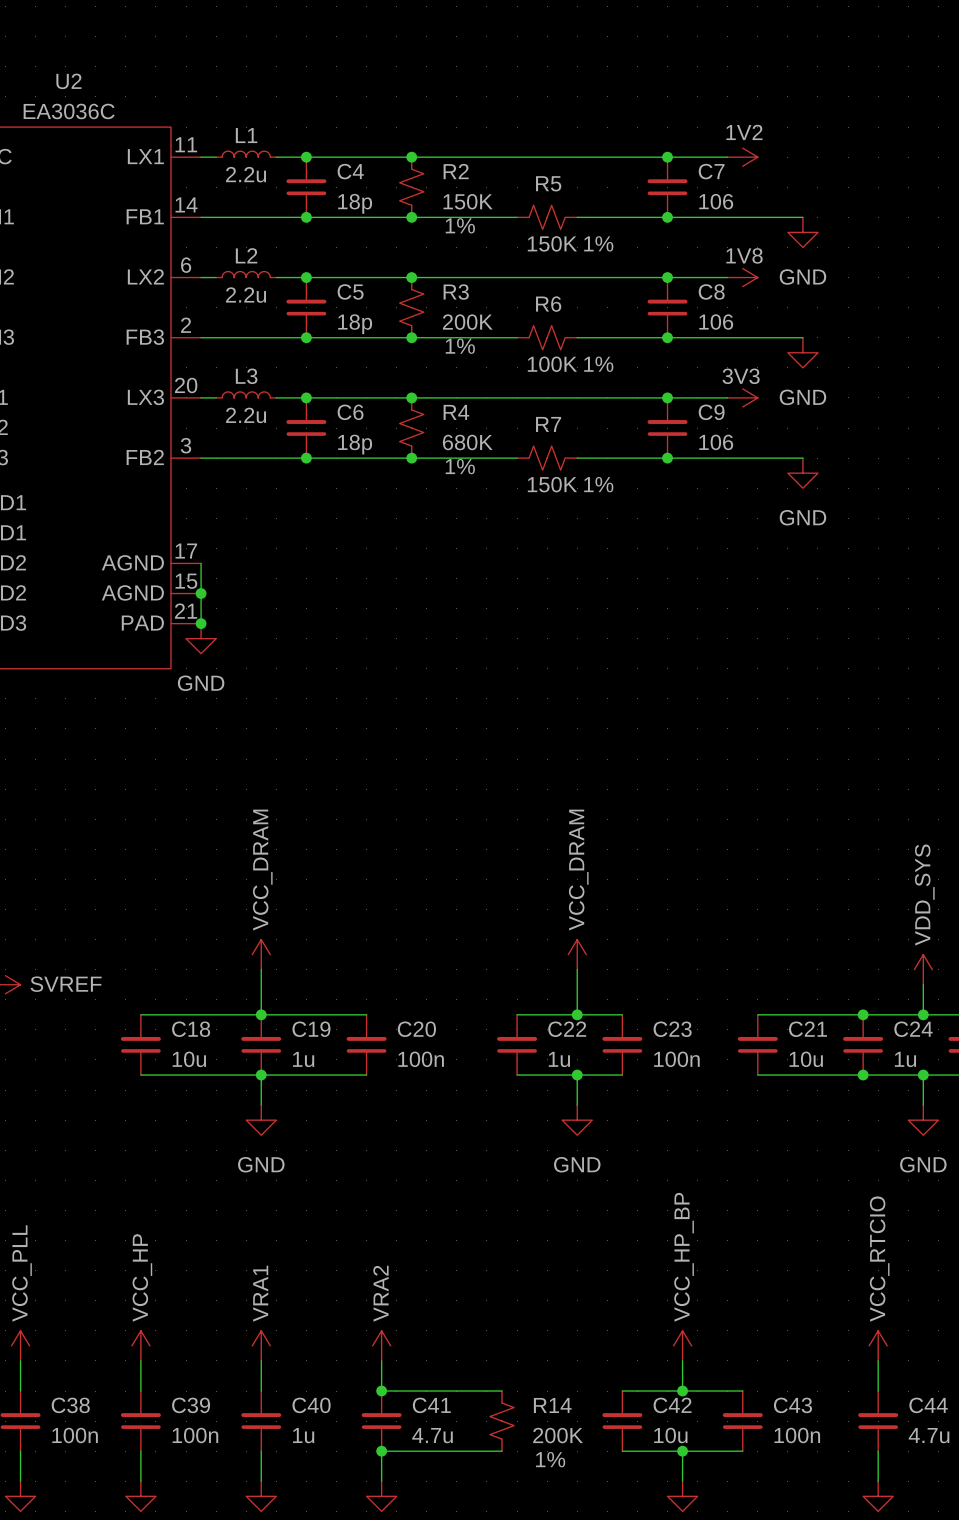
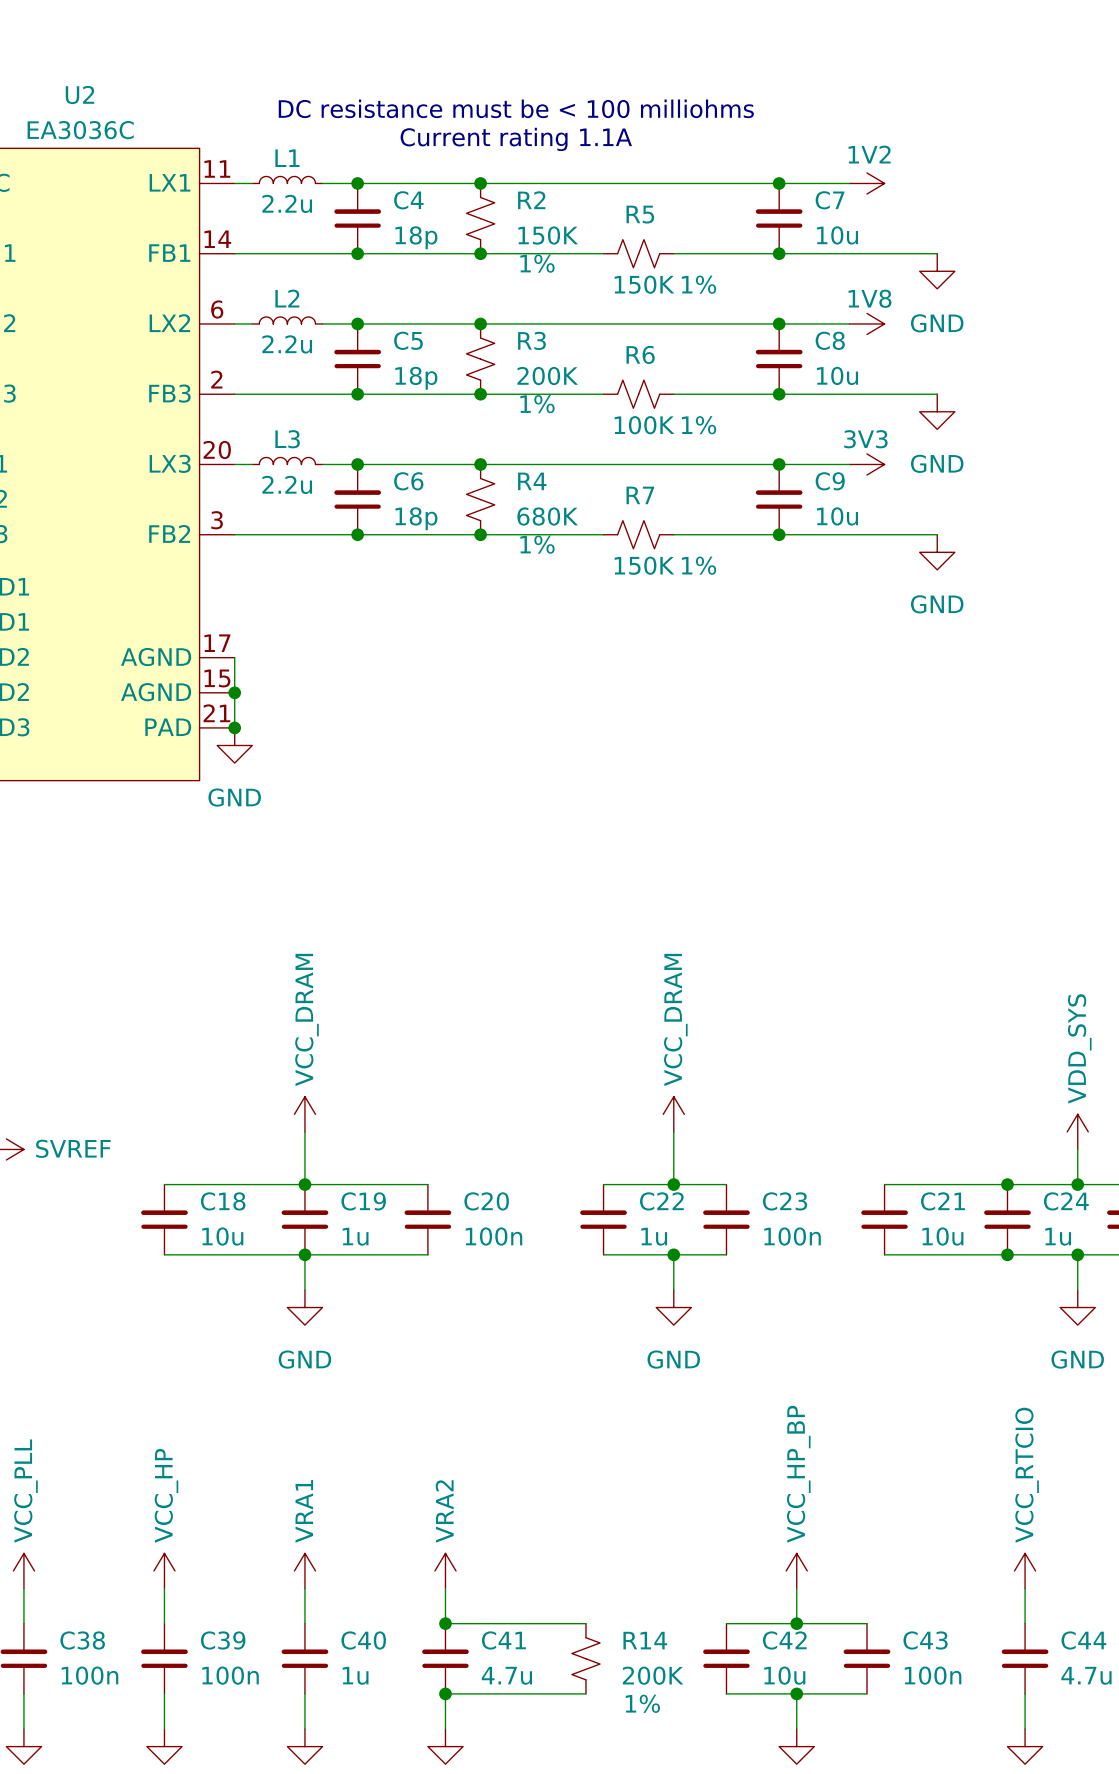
text: none -> DC resistance must be < 100 milliohms (516, 108)
text: none -> Current rating 1.1A (516, 139)
C7 value: 106 (716, 201) -> 10u (837, 235)
C8 value: 106 (716, 322) -> 10u (837, 375)
C9 value: 106 (716, 442) -> 10u (837, 516)

